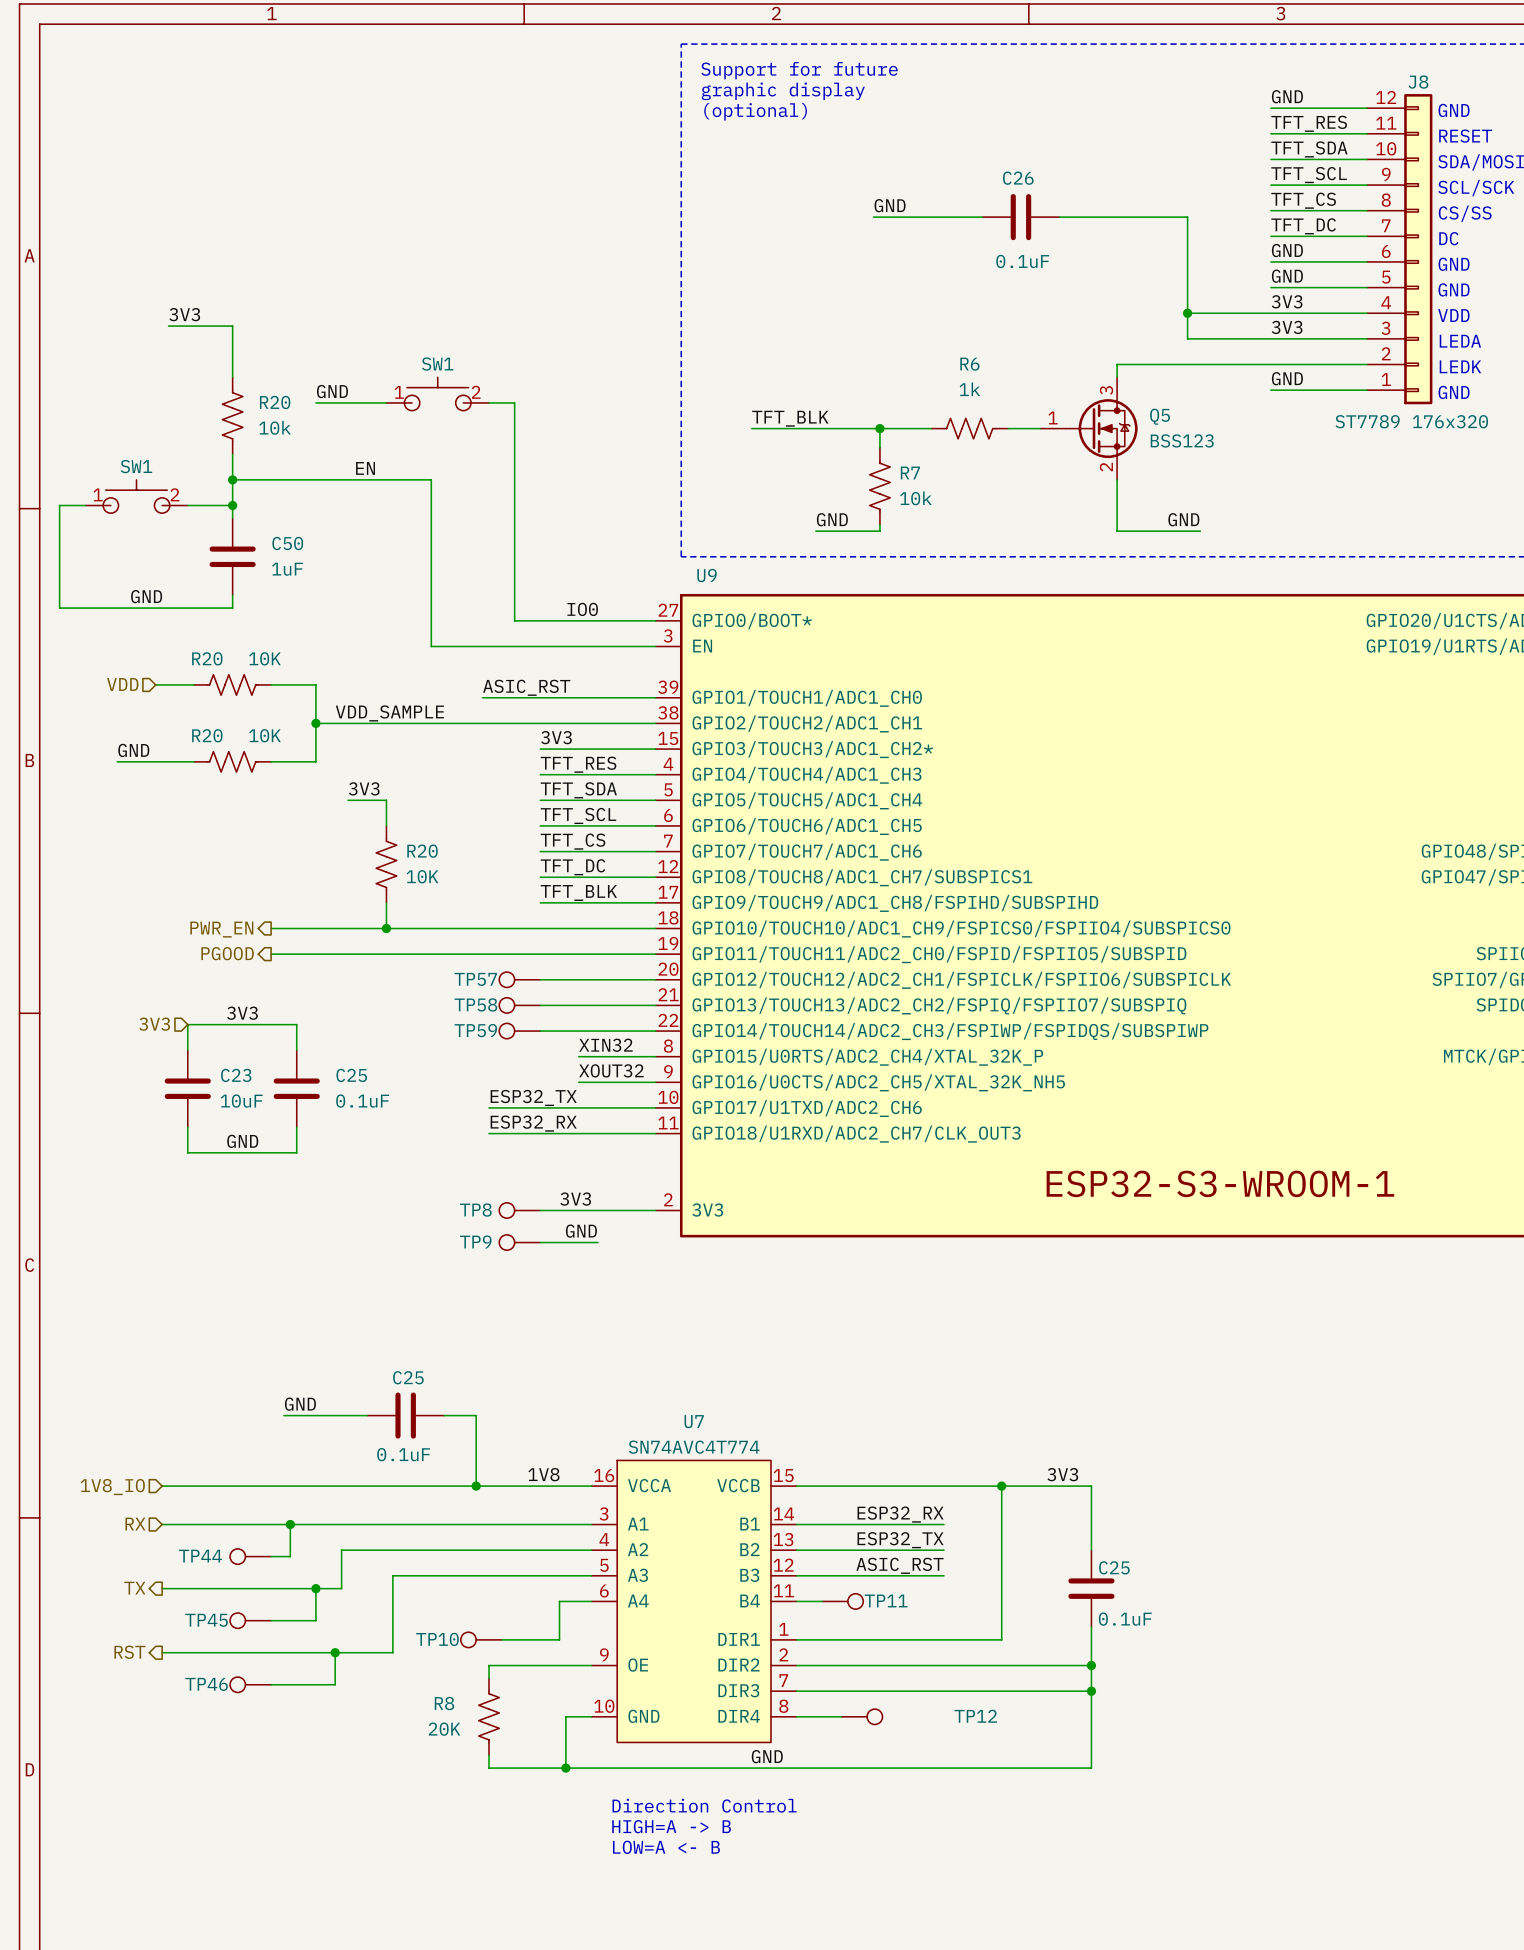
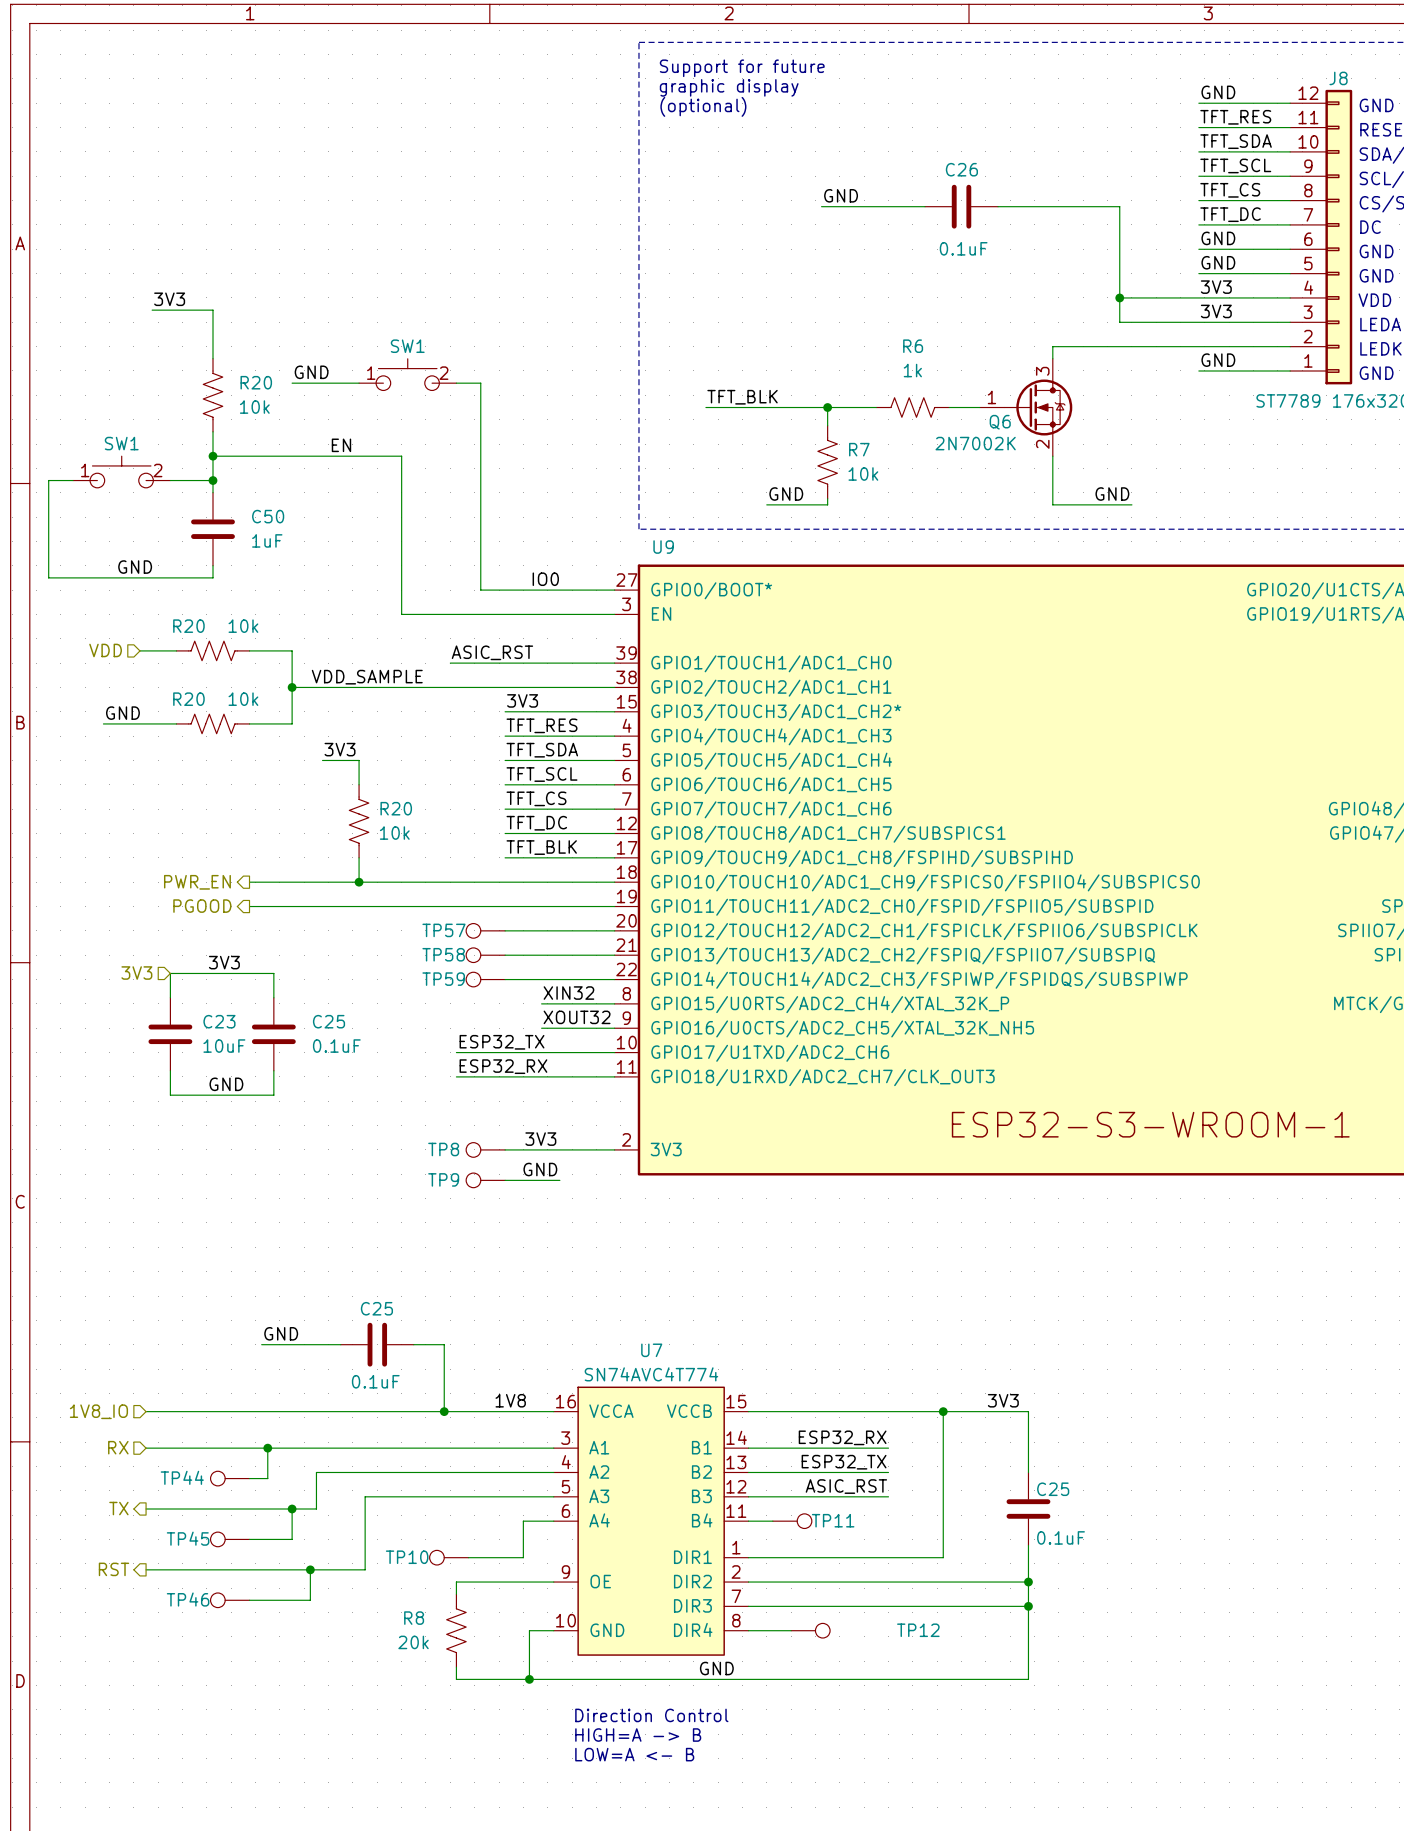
Q5 name: Q5 (1160, 416) -> Q6 (1000, 422)
Q5 value: BSS123 (1182, 440) -> 2N7002K (975, 443)
R20 value: 10K (264, 658) -> 10k (243, 626)
R20 value: 10K (264, 735) -> 10k (243, 699)
R20 value: 10K (422, 876) -> 10k (394, 833)
R8 value: 20K (444, 1729) -> 20k (413, 1642)

